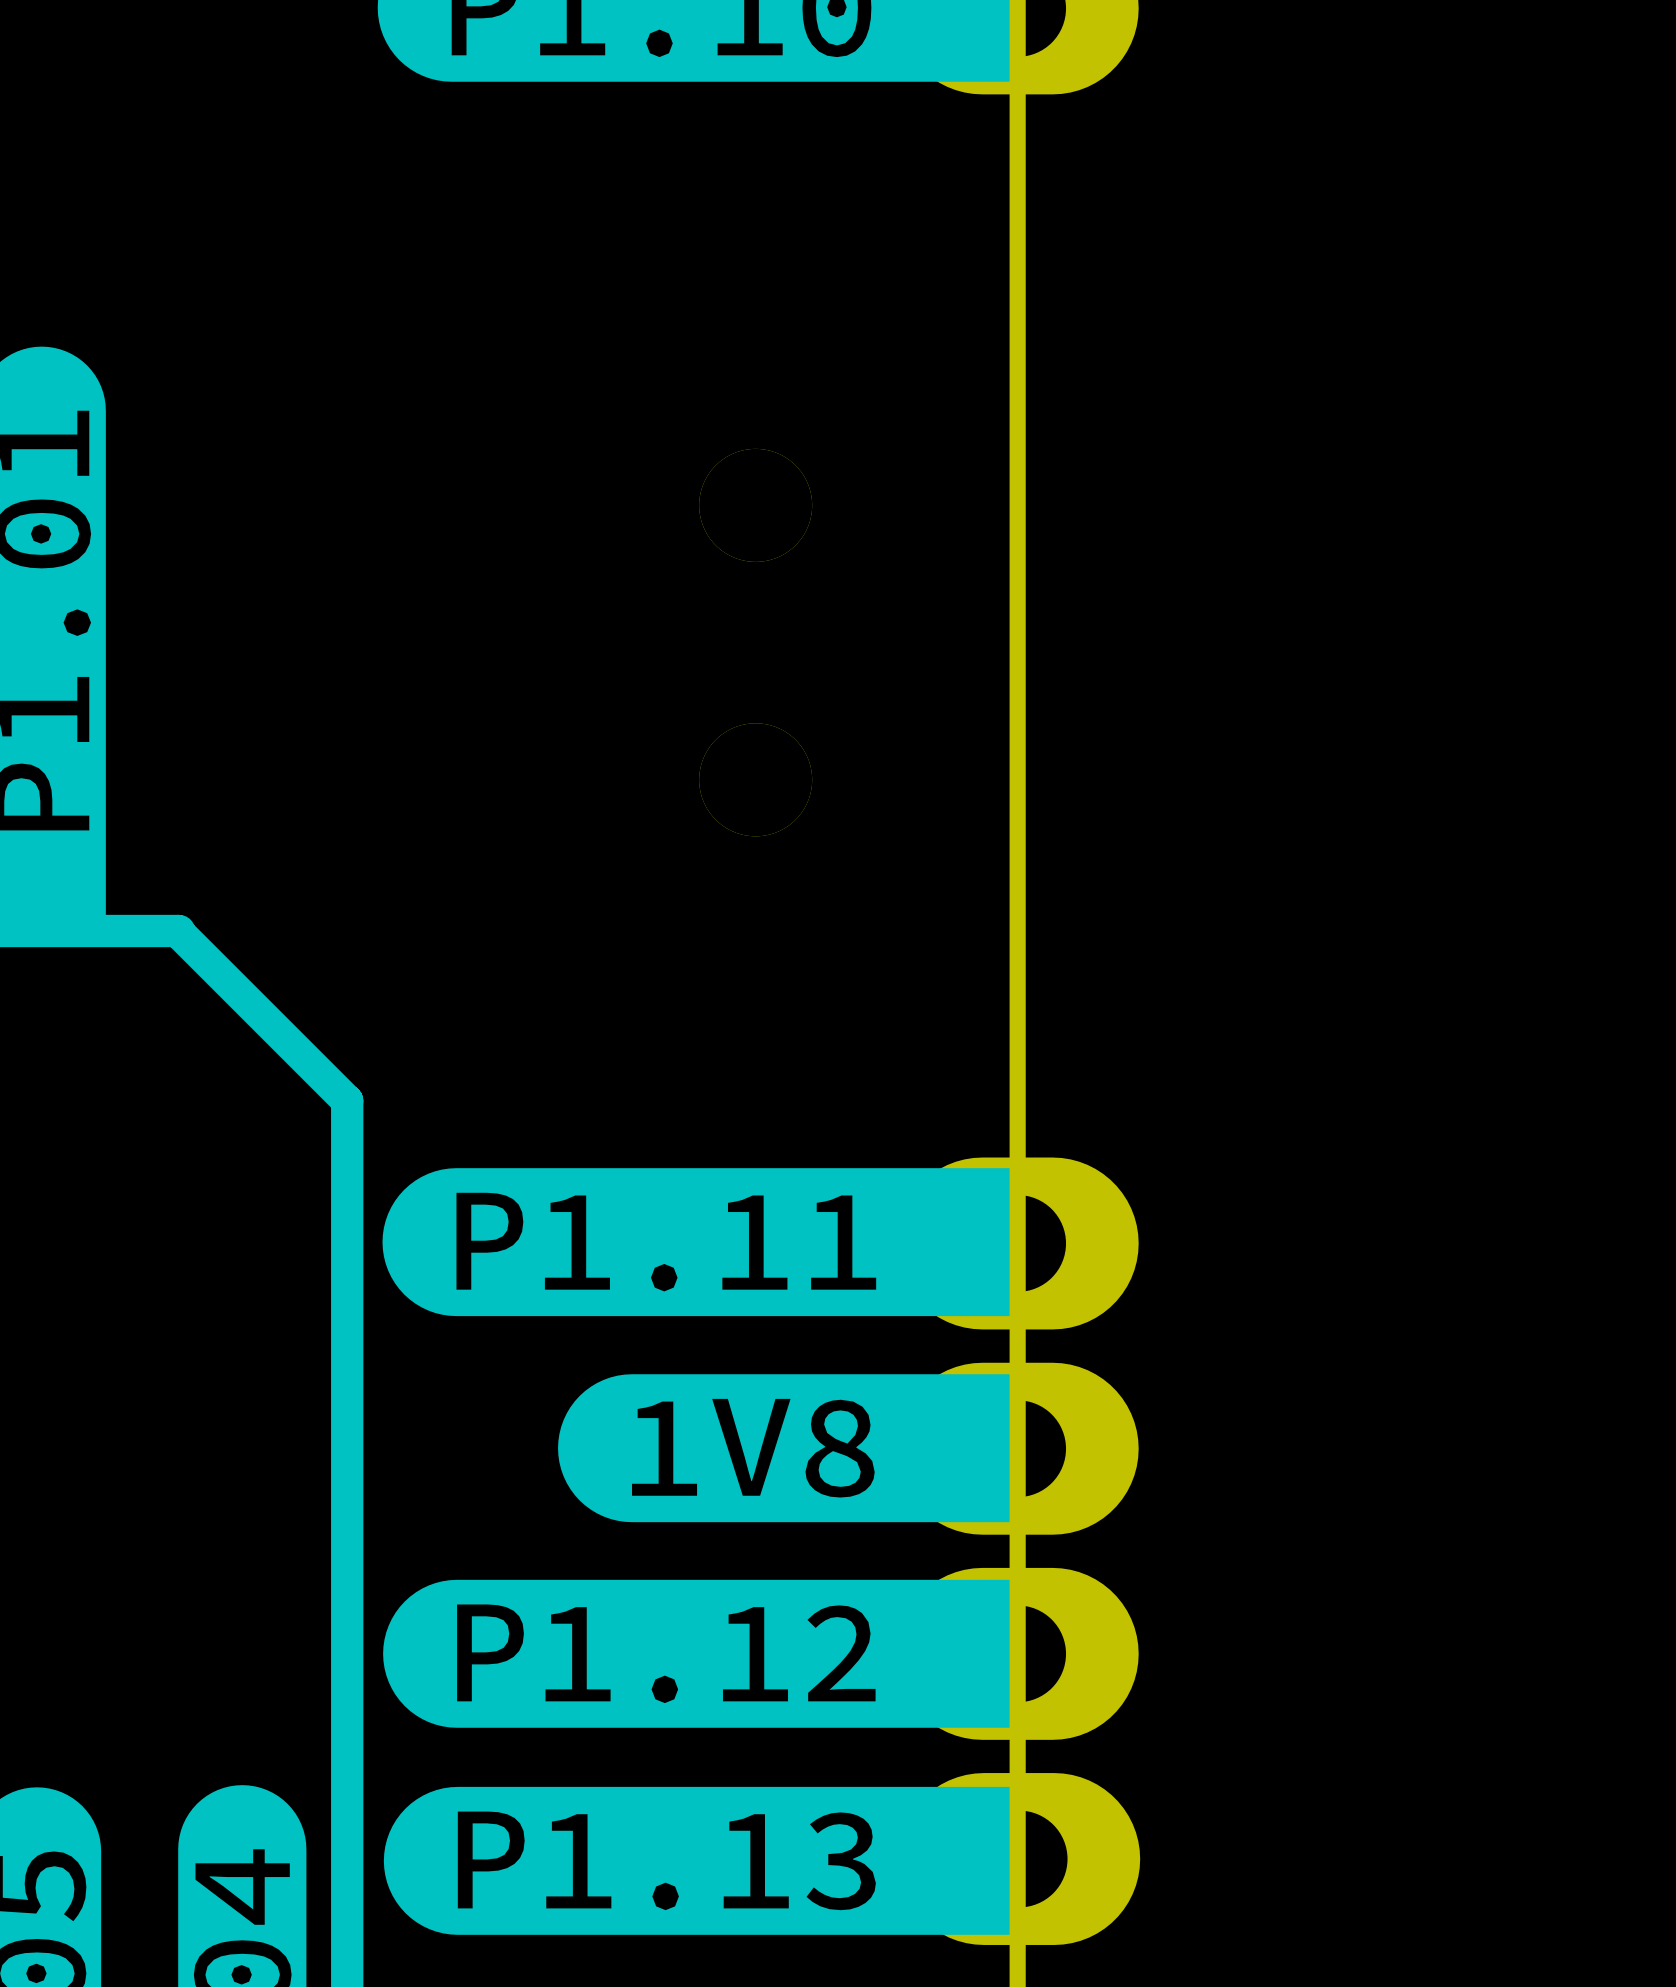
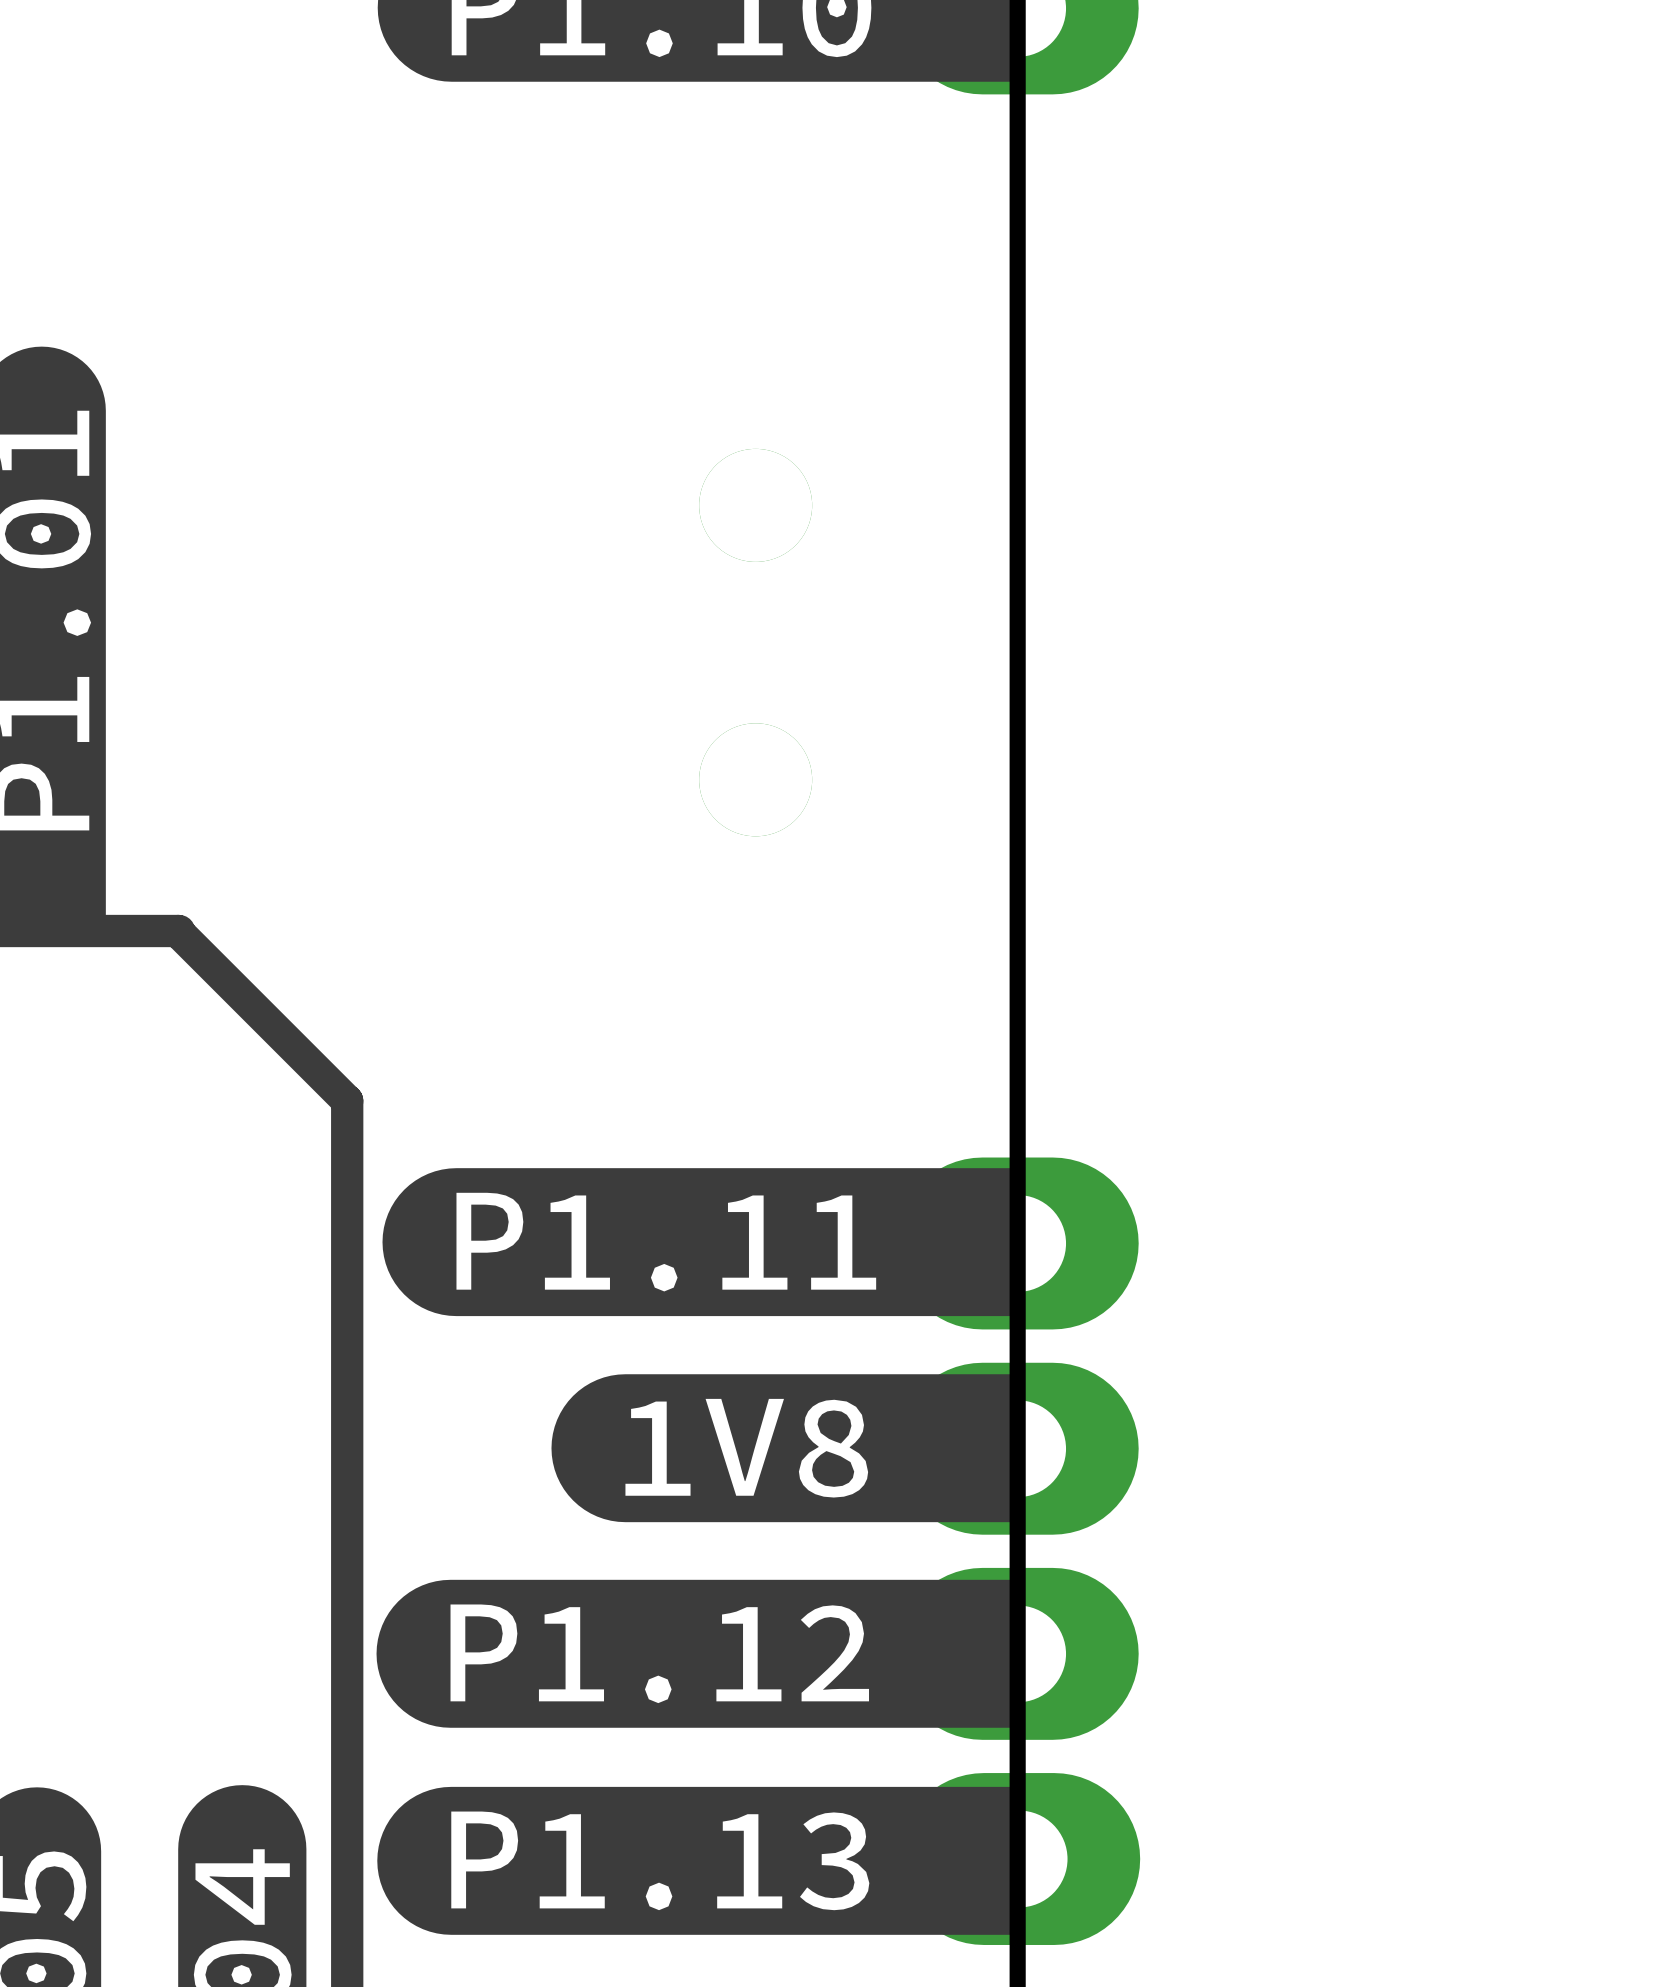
drawing shape: [558, 1374, 1018, 1523] -> [551, 1374, 1016, 1523]
drawing shape: [383, 1579, 1019, 1728] -> [376, 1579, 1017, 1728]
drawing shape: [383, 1786, 1019, 1935] -> [377, 1786, 1018, 1935]

